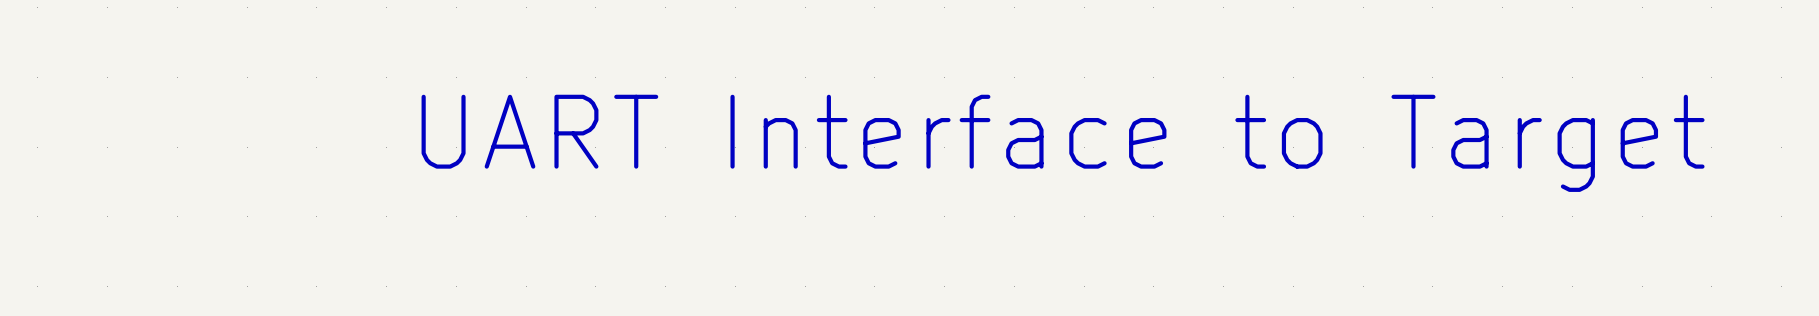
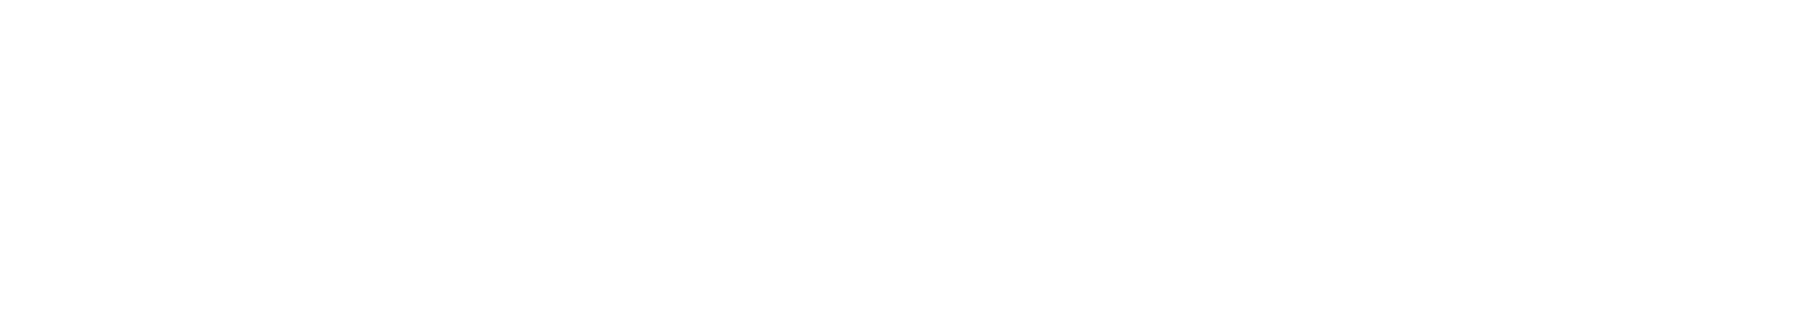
text: UART Interface to Target (1063, 143) -> none

